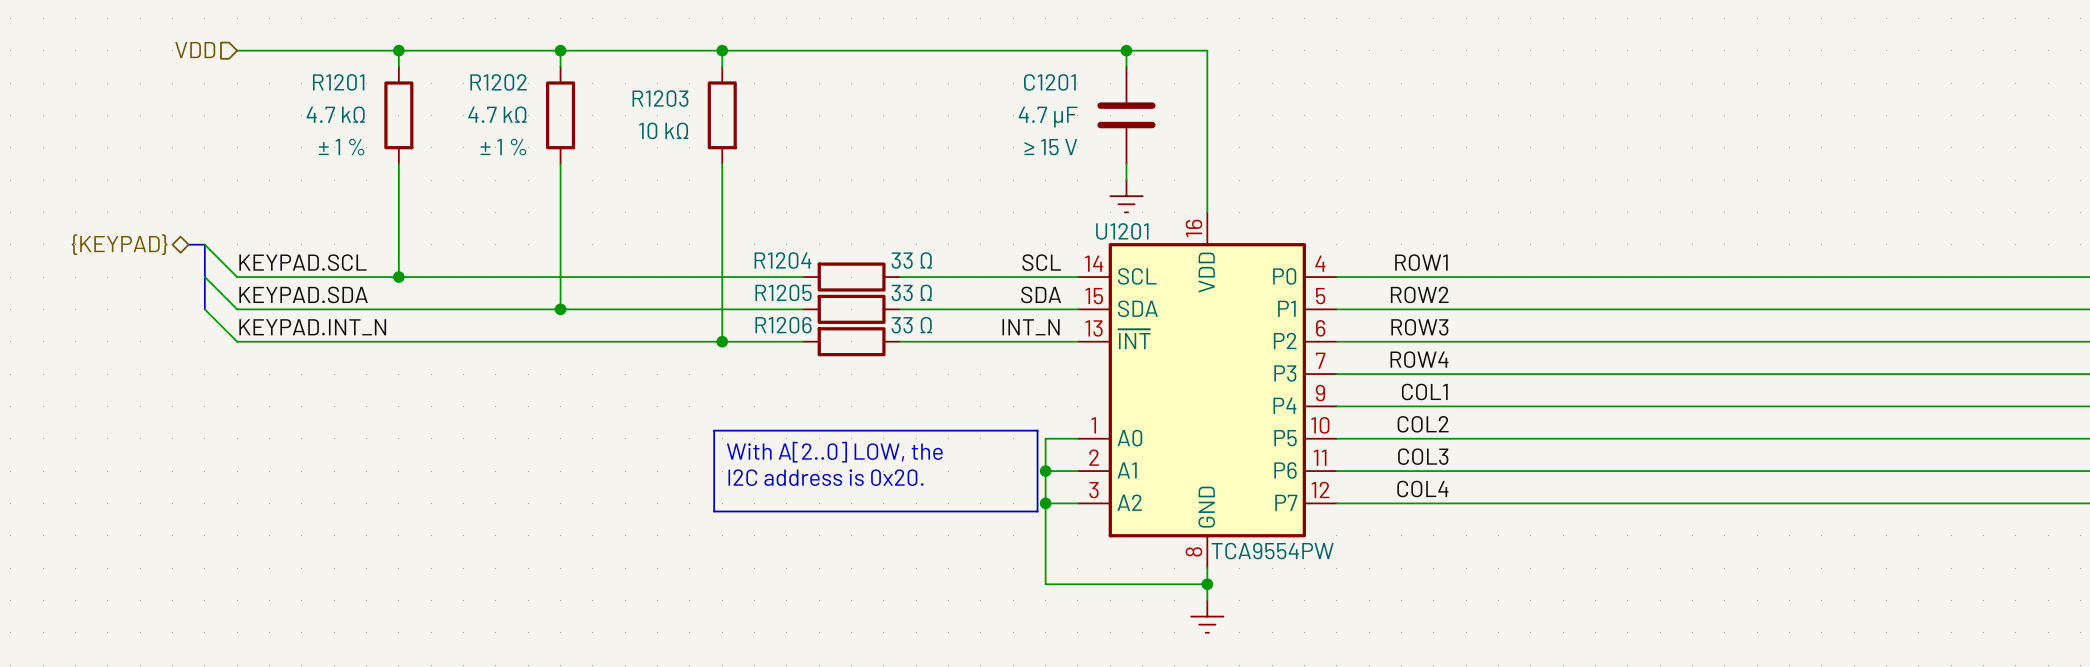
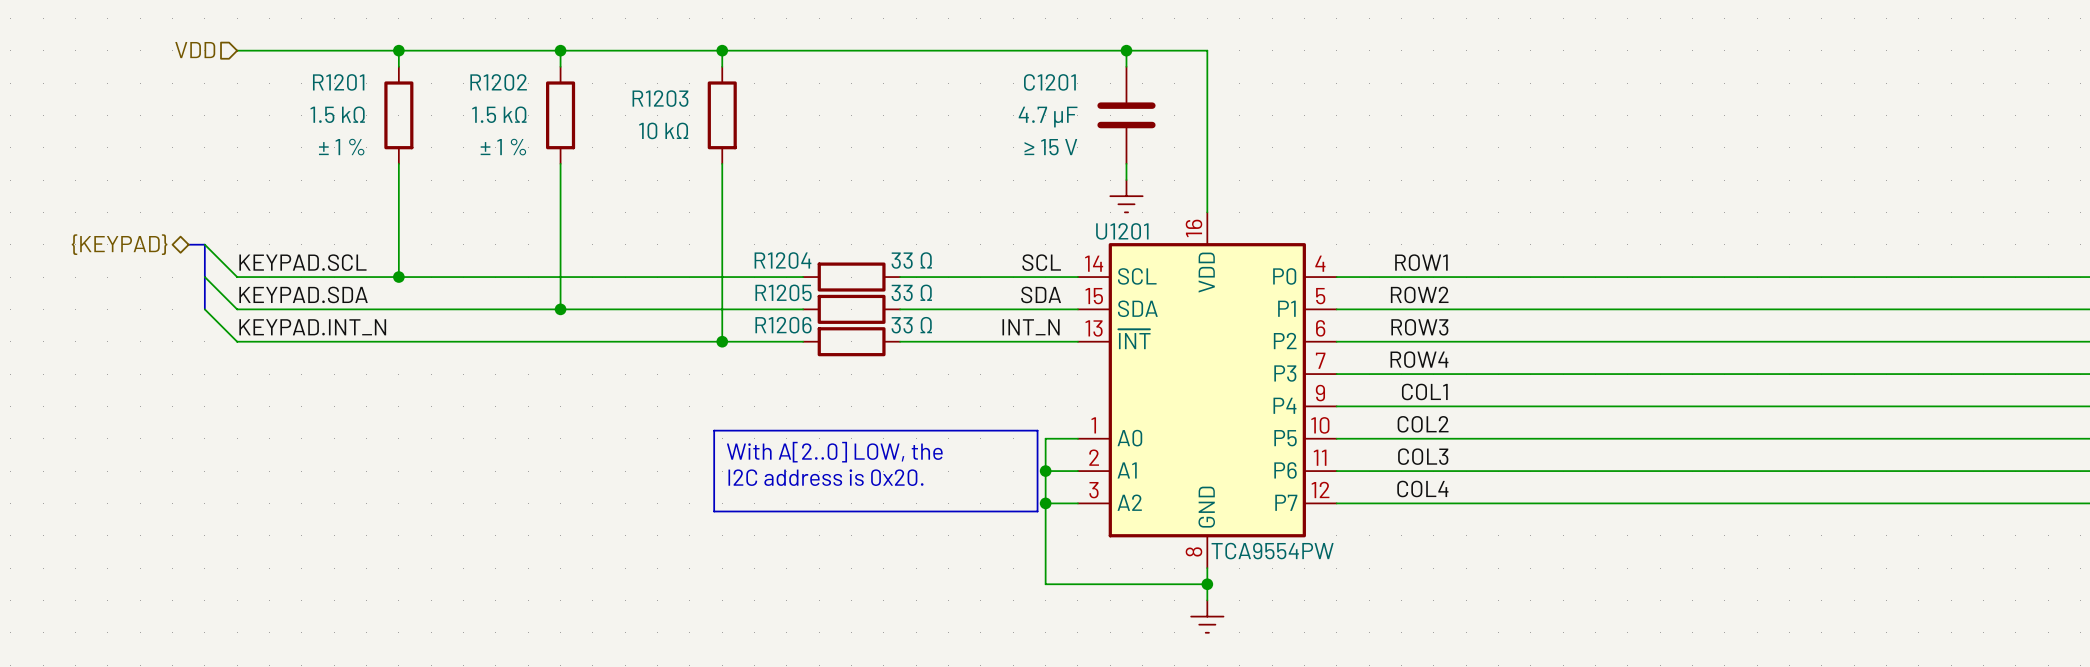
R1201 value: 4.7 kΩ (335, 114) -> 1.5 kΩ (337, 114)
R1202 value: 4.7 kΩ (497, 114) -> 1.5 kΩ (499, 114)

